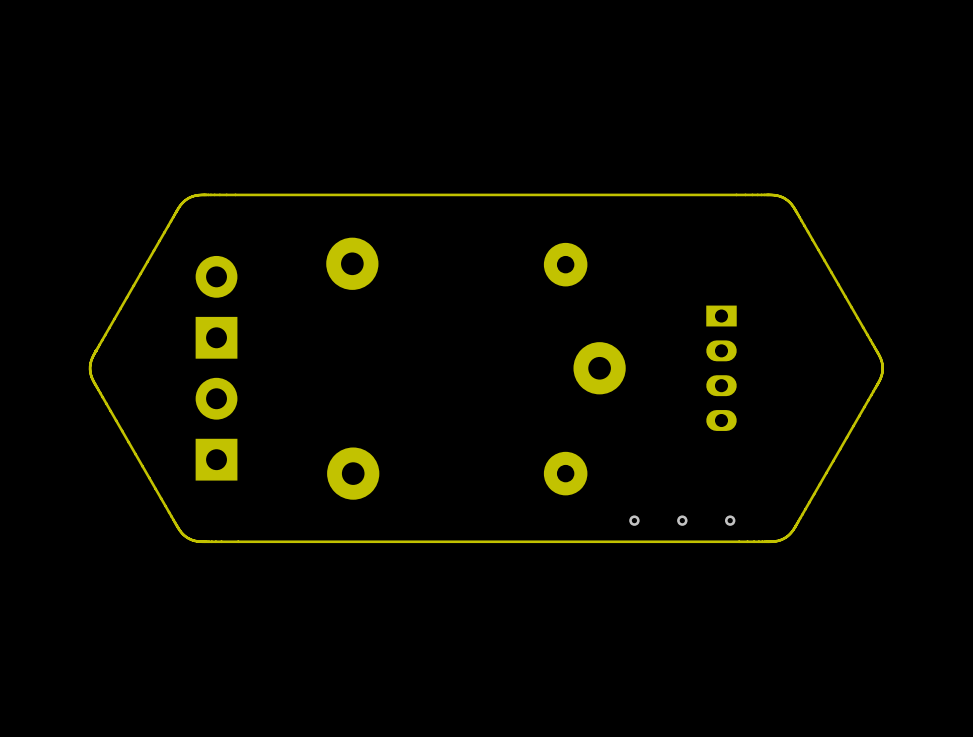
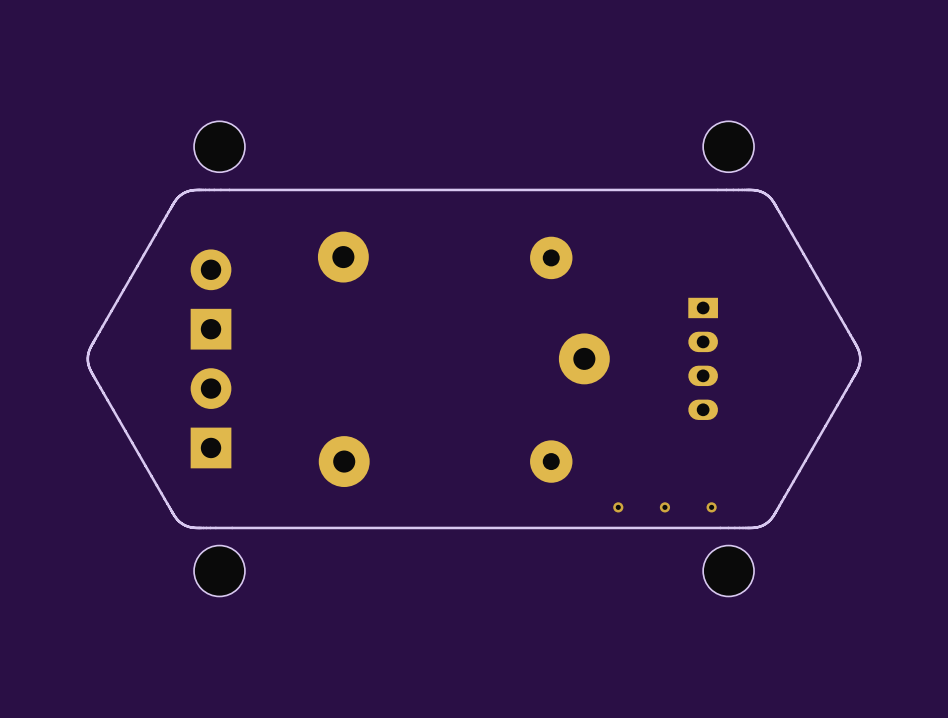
part: none -> (219, 146)
part: none -> (728, 146)
part: none -> (219, 571)
part: none -> (728, 571)

